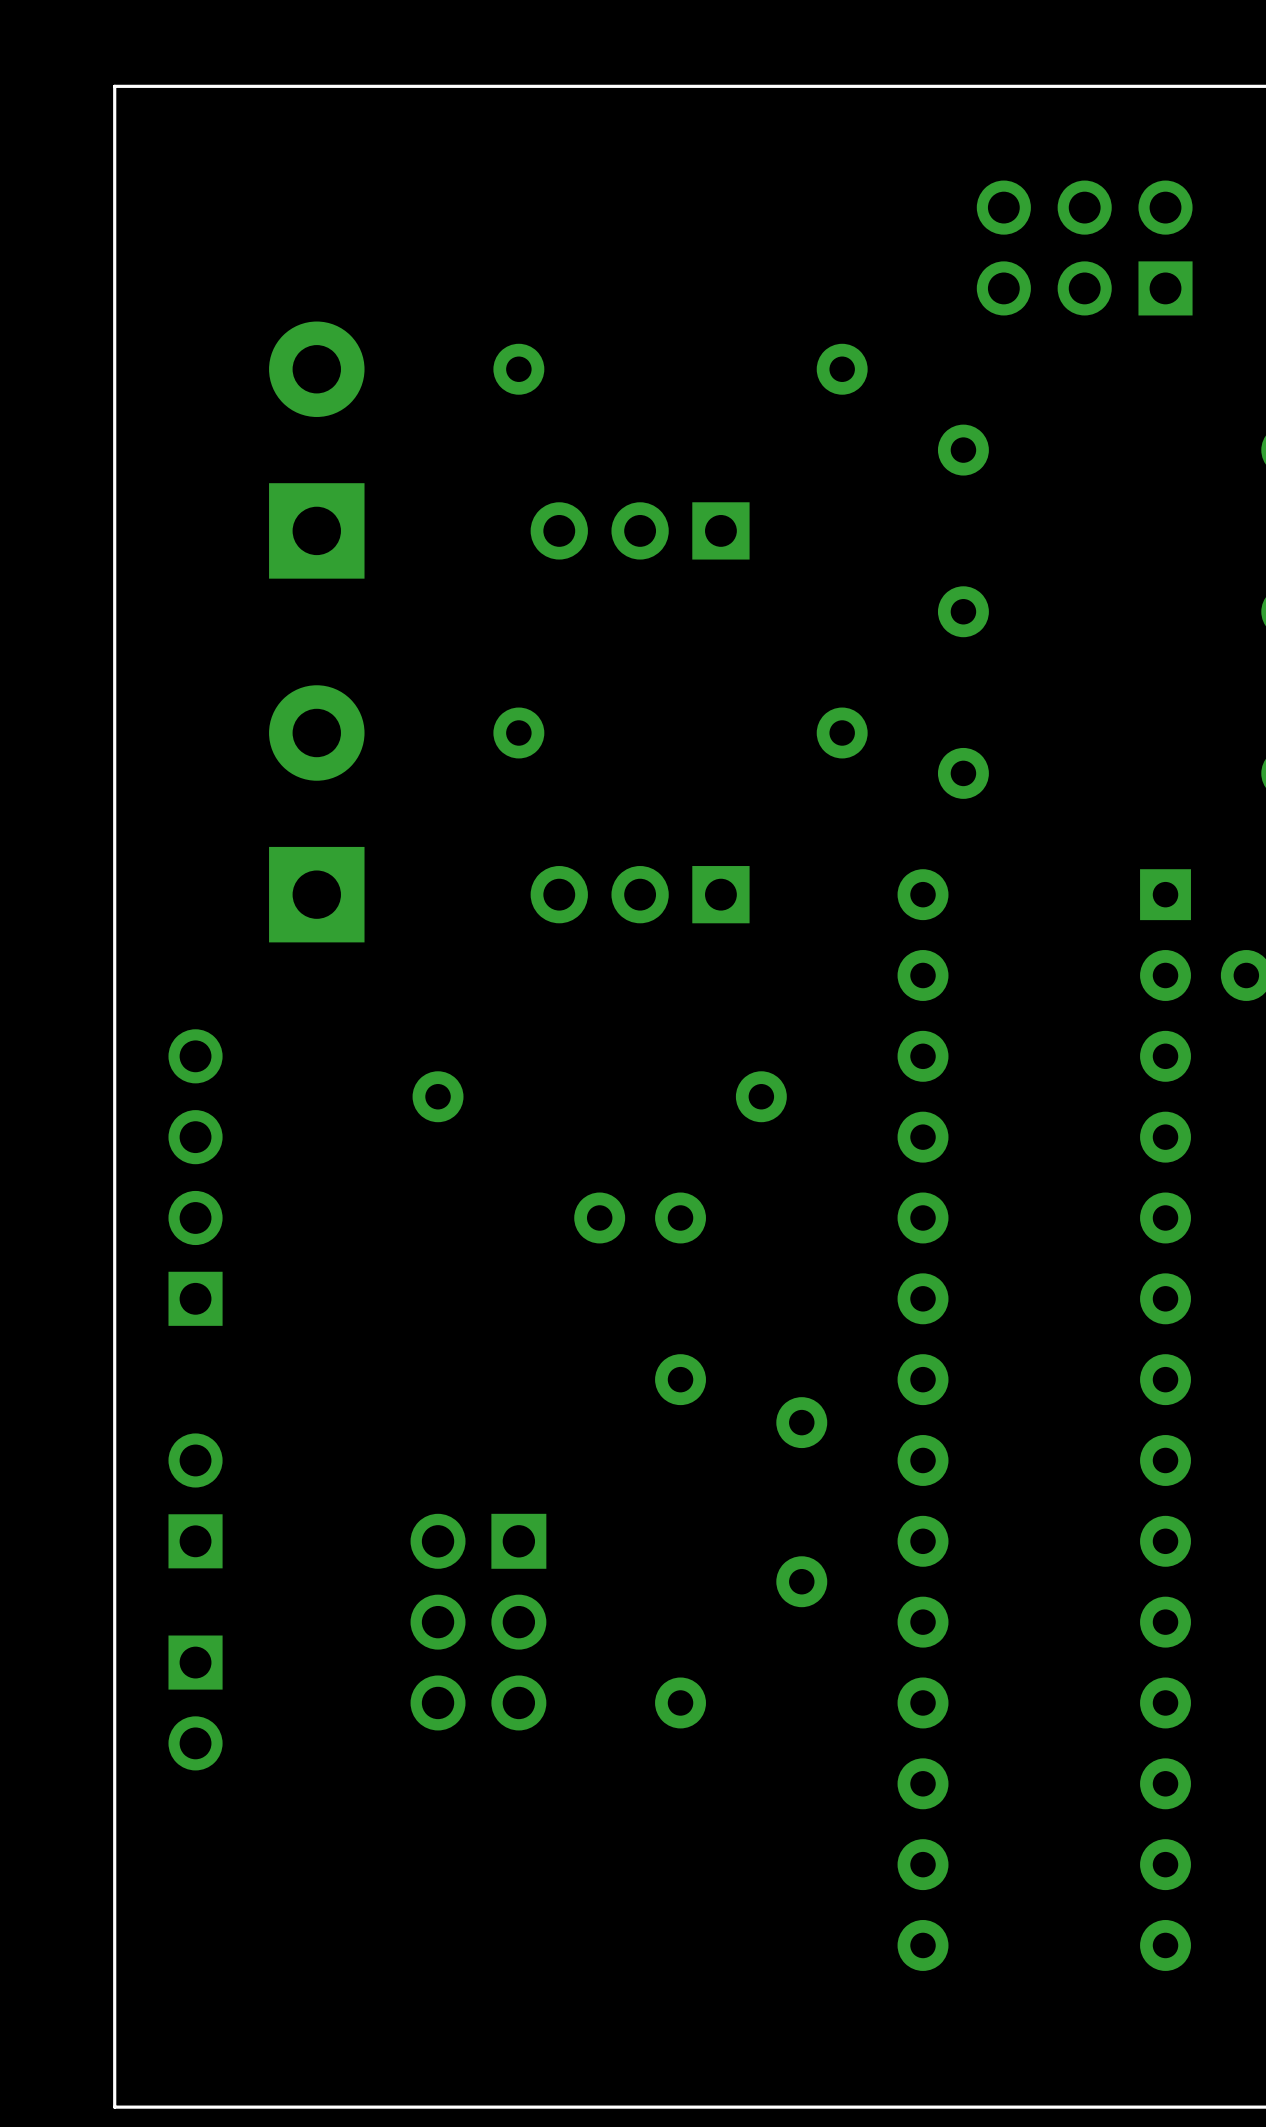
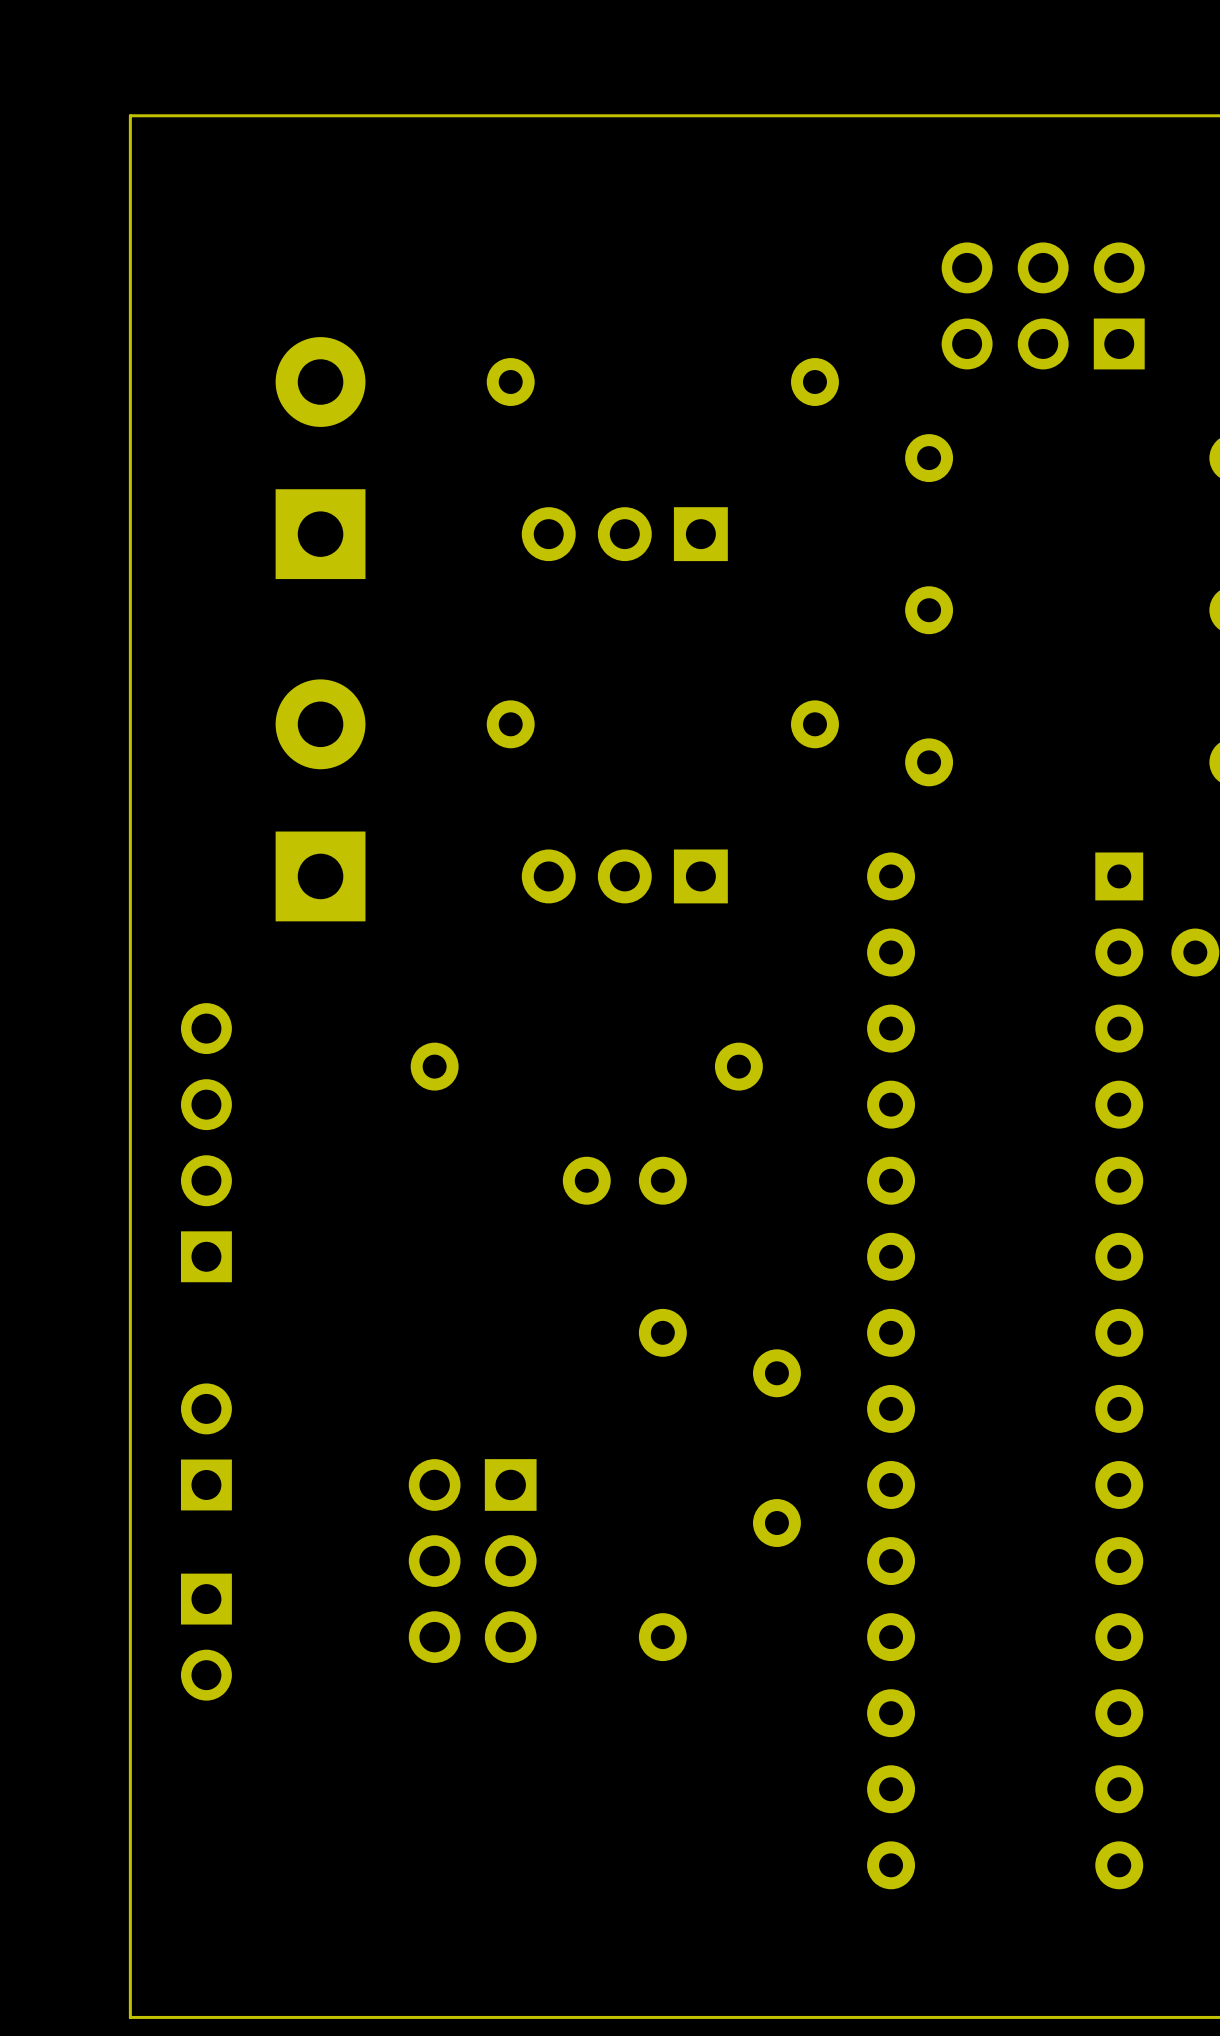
part position: (1084, 248) -> (1043, 305)

